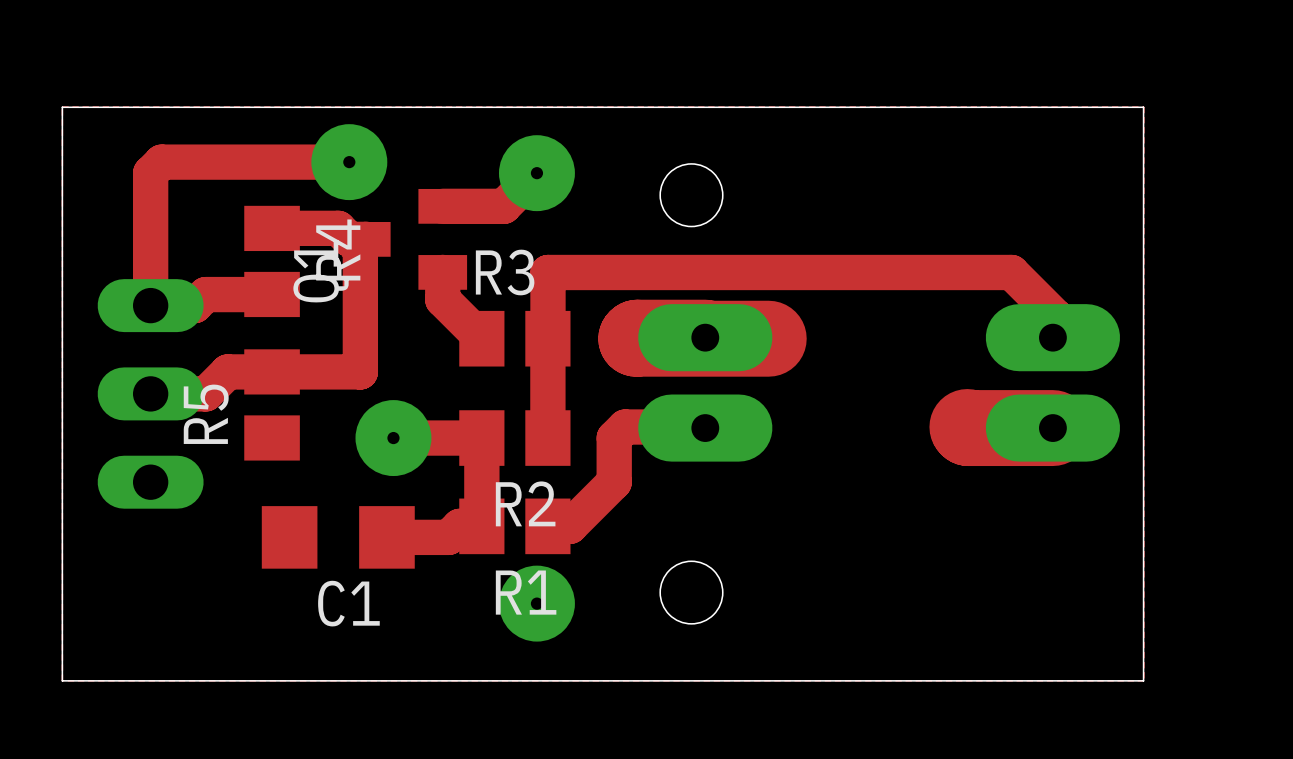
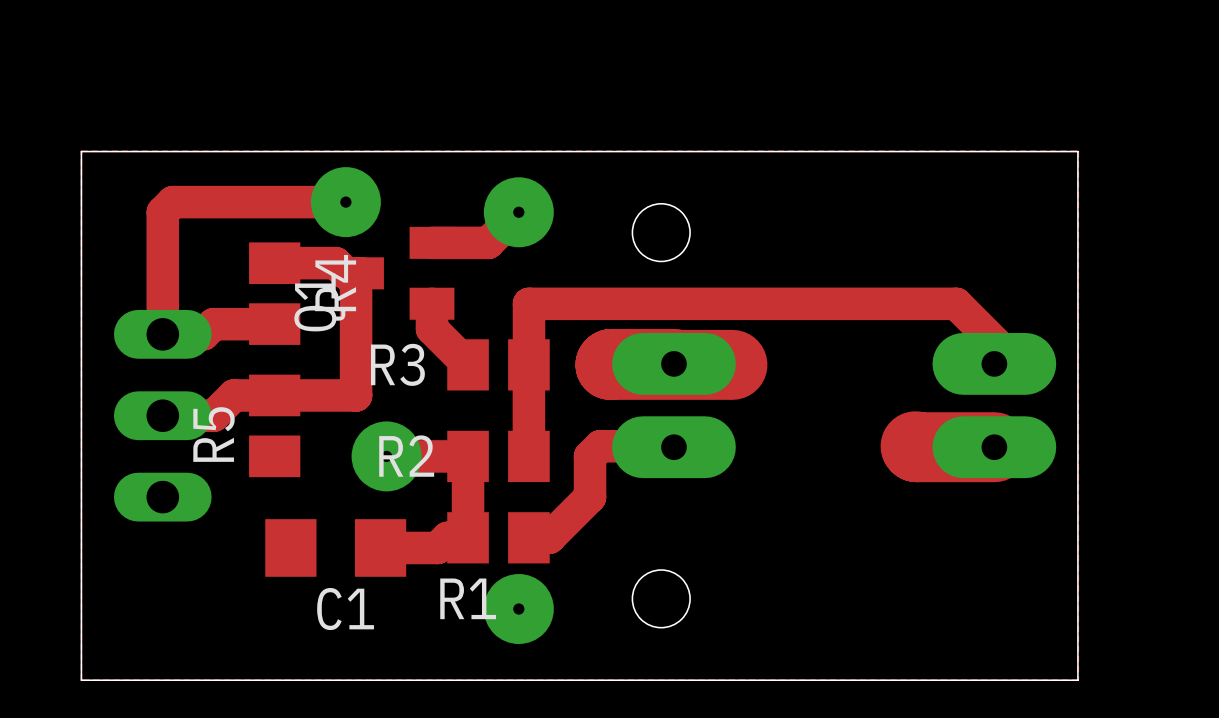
R3 name position: R3 (505, 272) -> R3 (397, 364)
R2 name position: R2 (525, 503) -> R2 (406, 456)
R1 name position: R1 (526, 592) -> R1 (468, 598)

